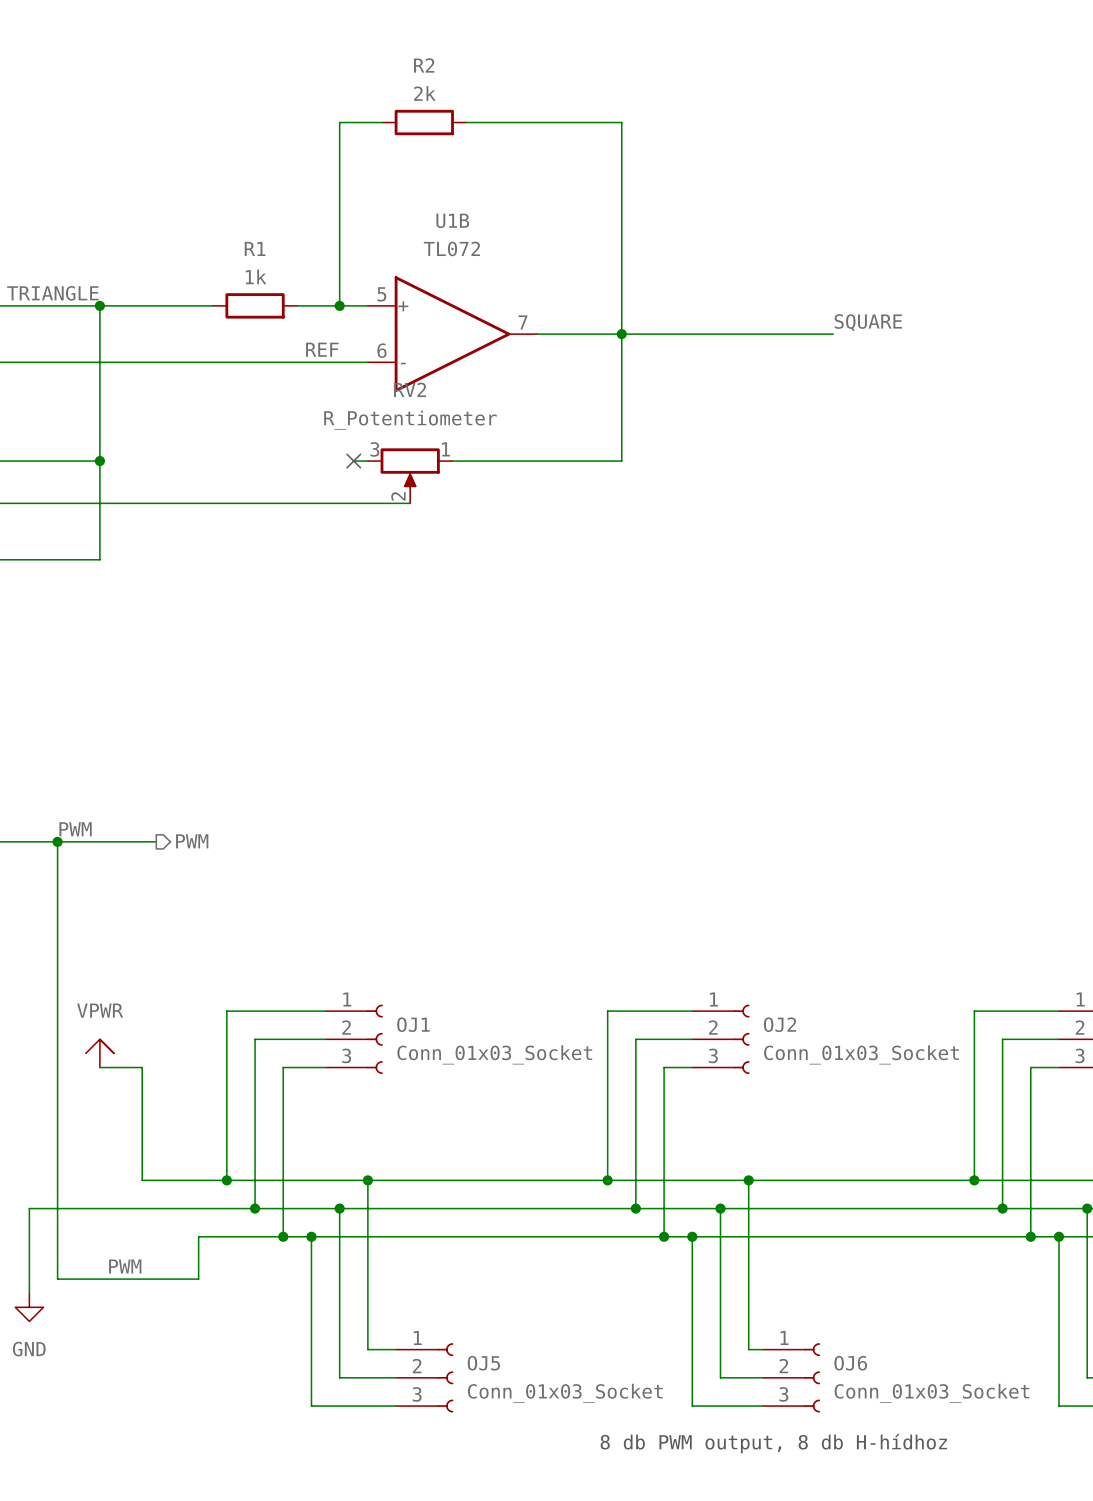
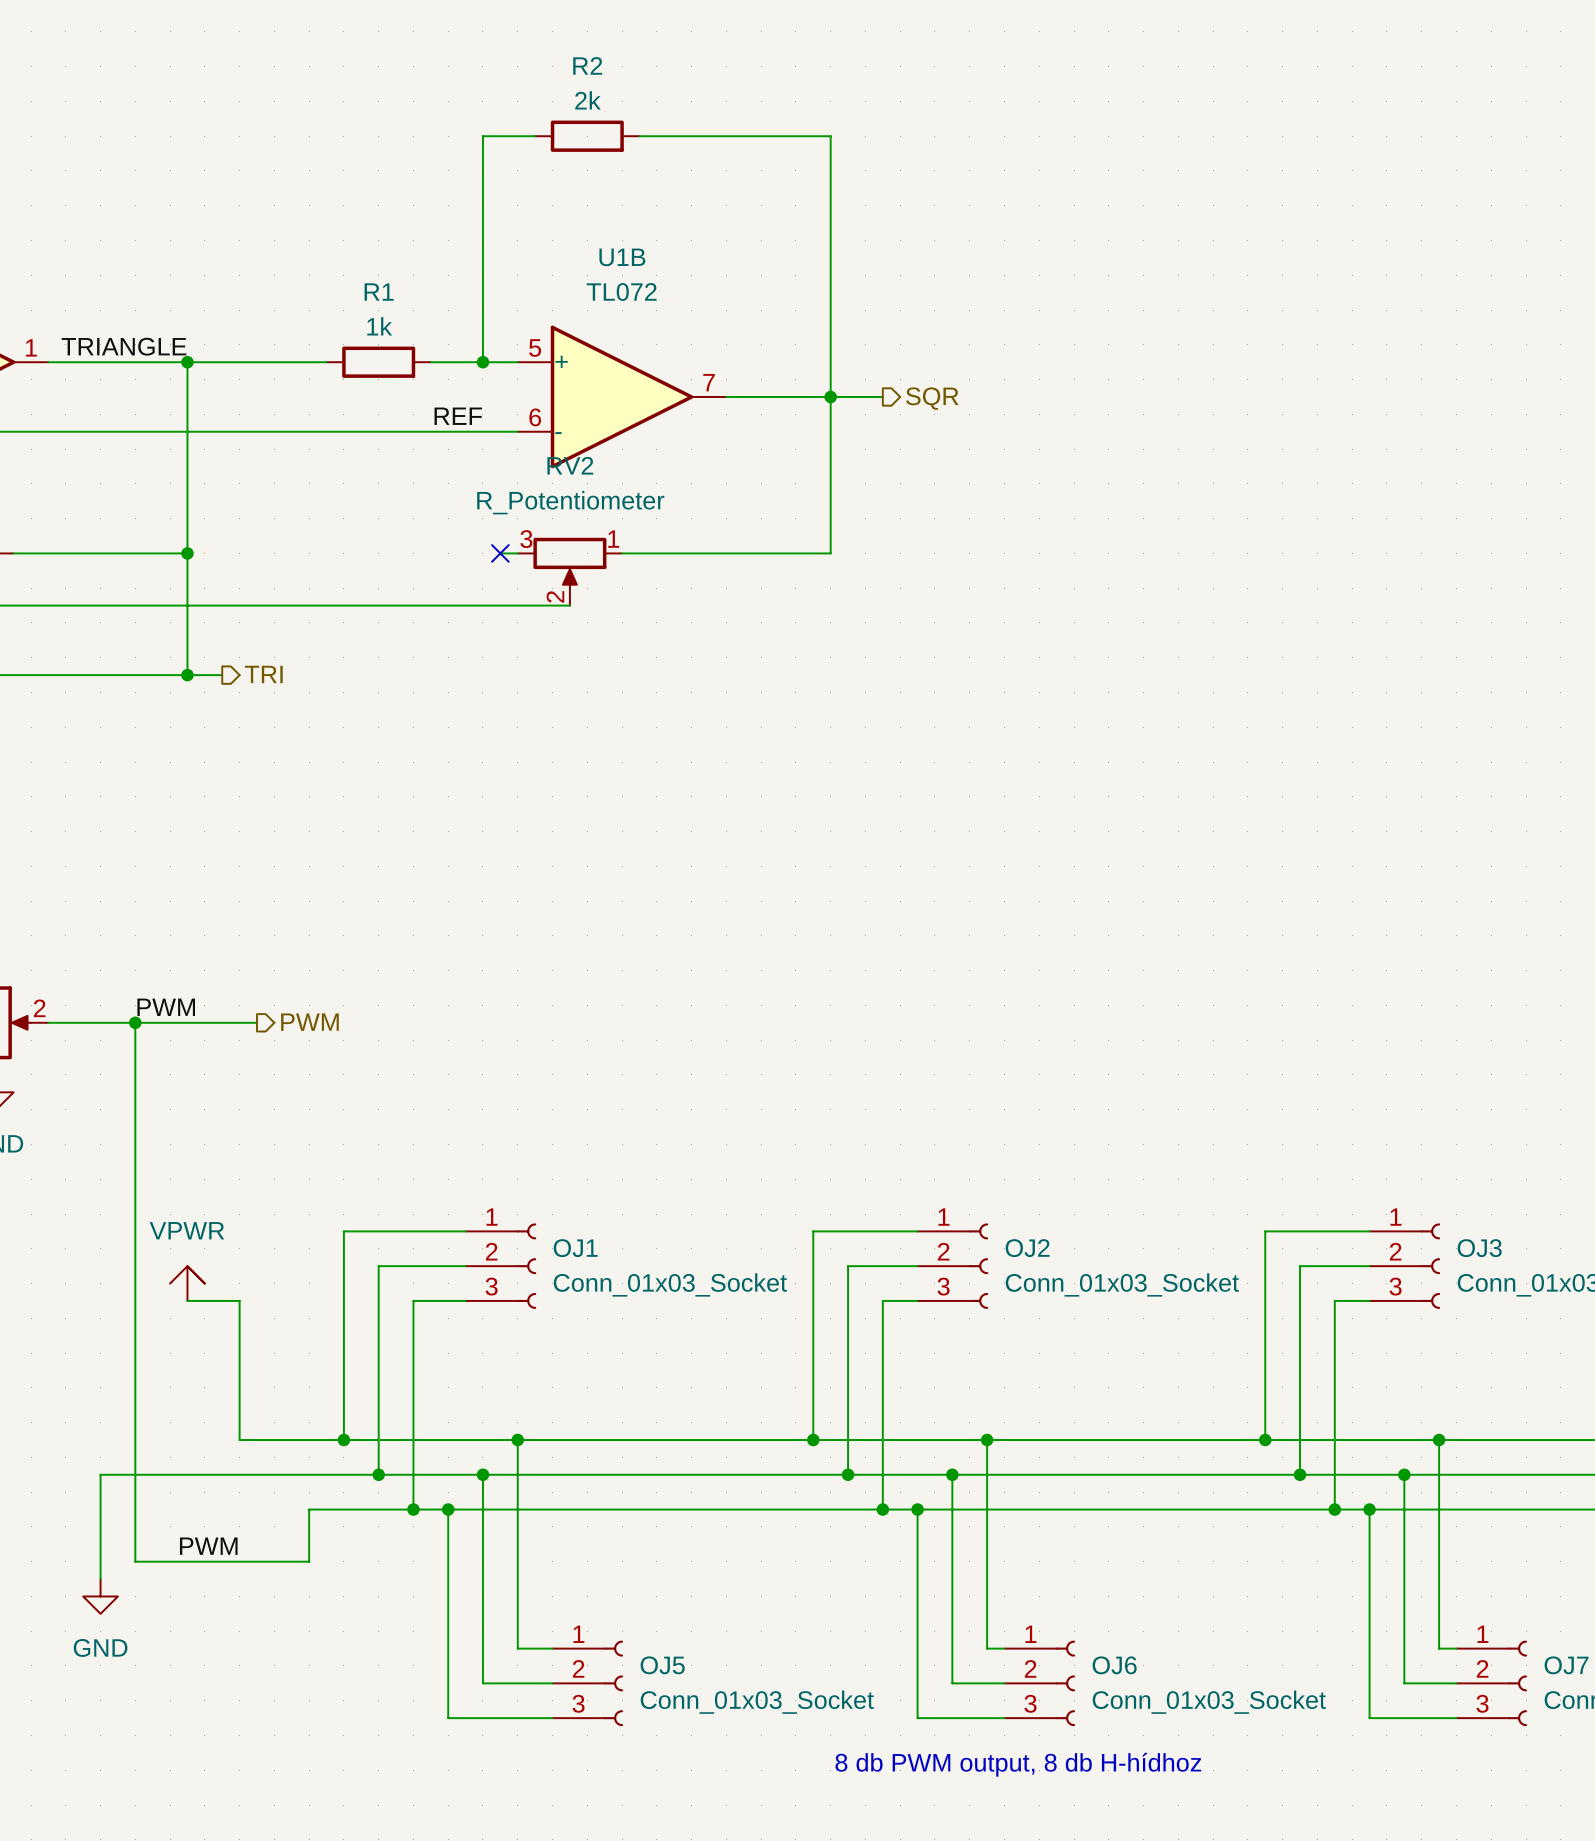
label: SQUARE (868, 322) -> none
wire: (664, 334) (833, 334) -> none
hierarchical label: none -> SQR (932, 398)
wire: none -> (187, 675) (222, 675)
junction: none -> (187, 675)
hierarchical label: none -> TRI (263, 674)

